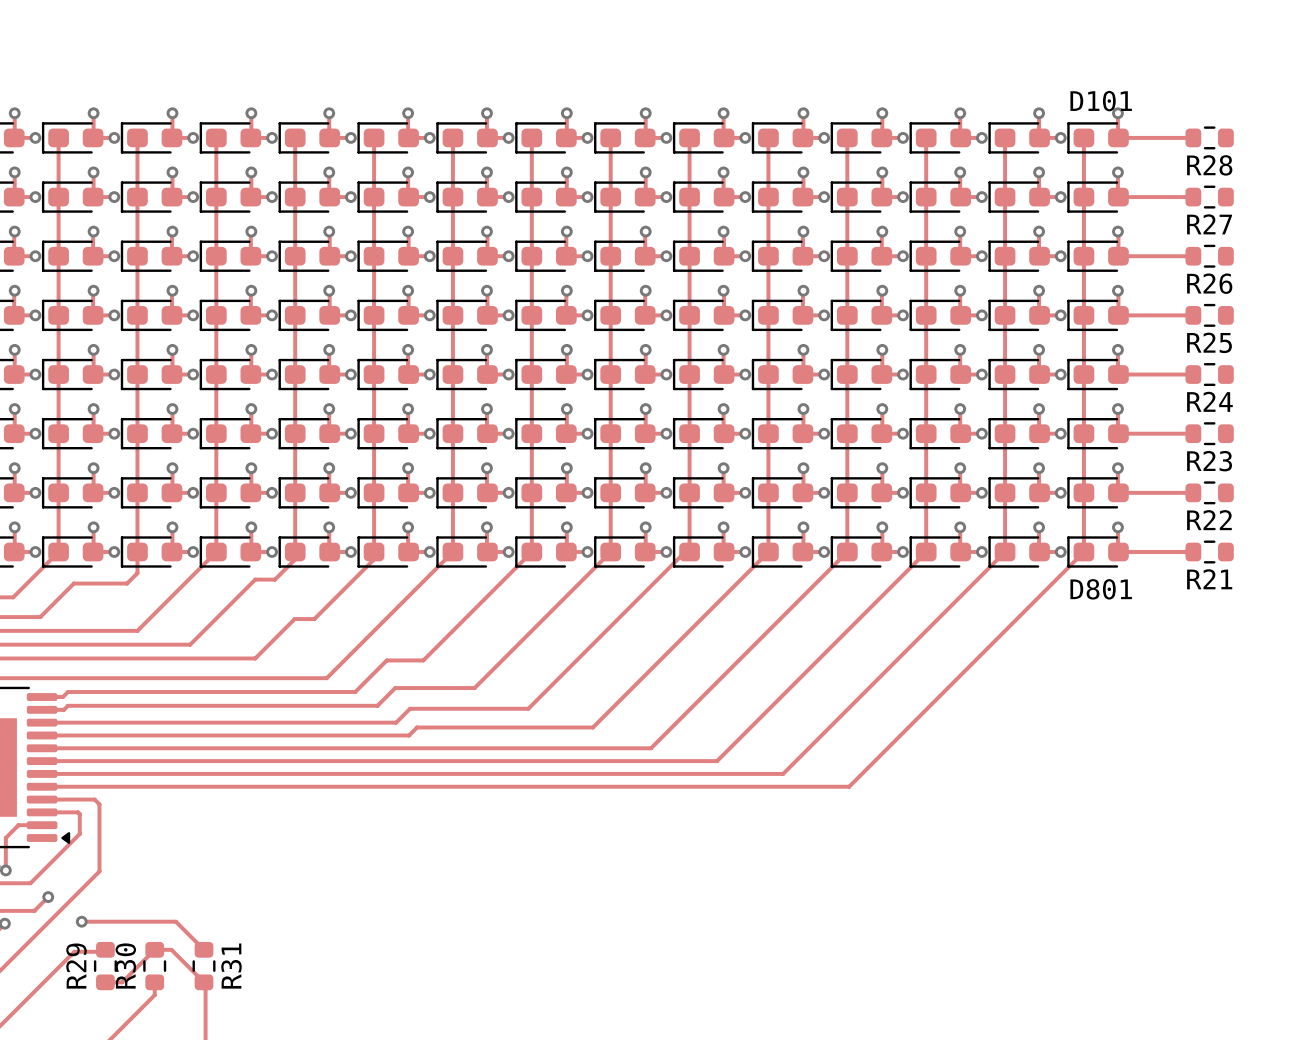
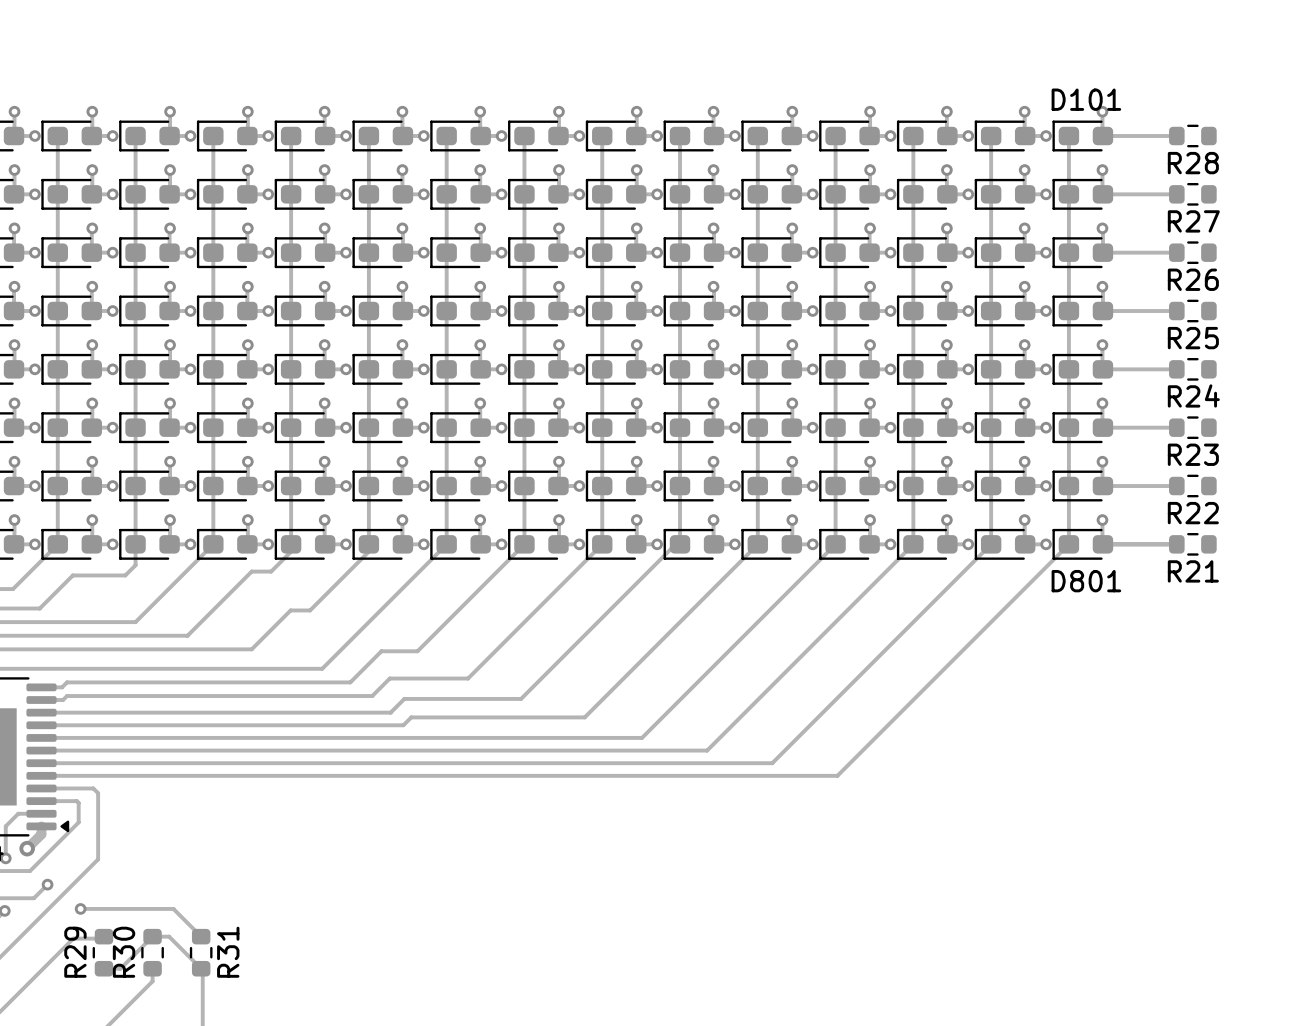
track: none -> (41, 826) (41, 834) (27, 848)
via: none -> (27, 848)

